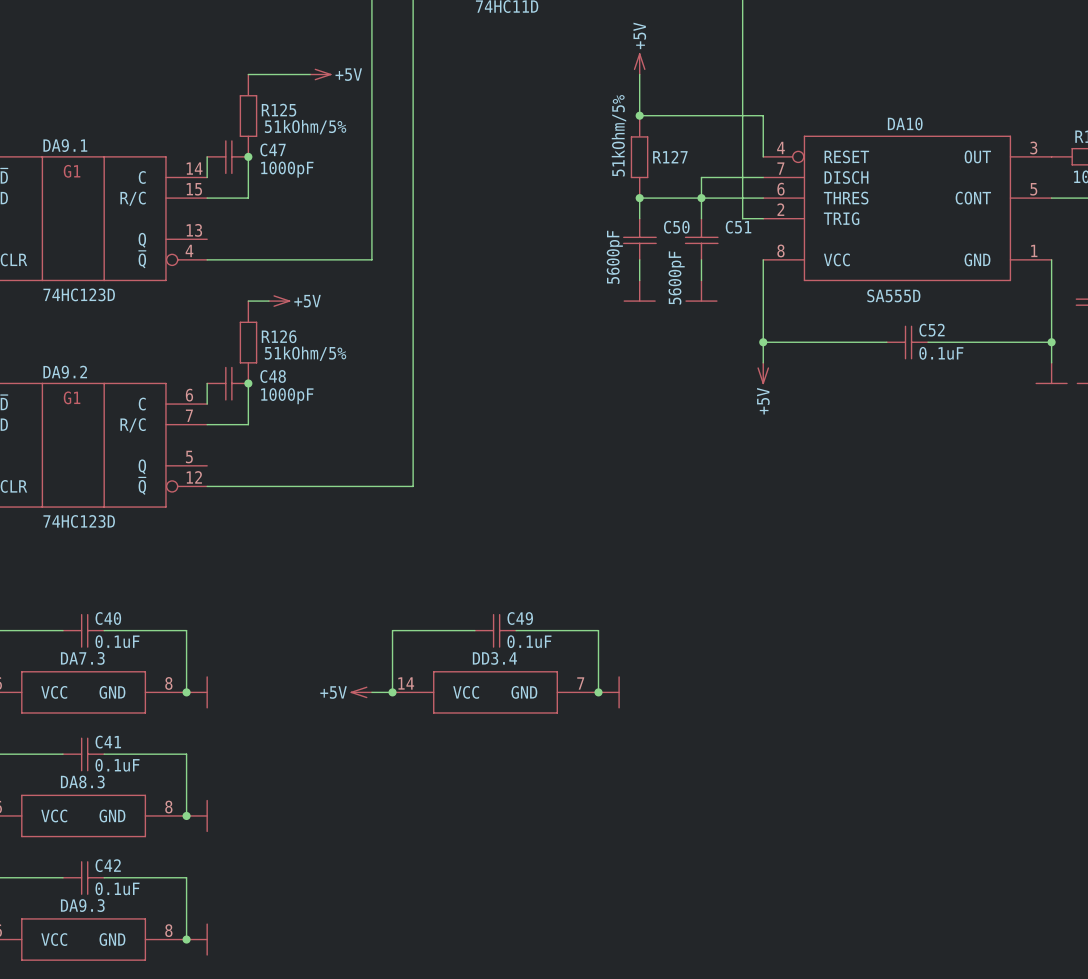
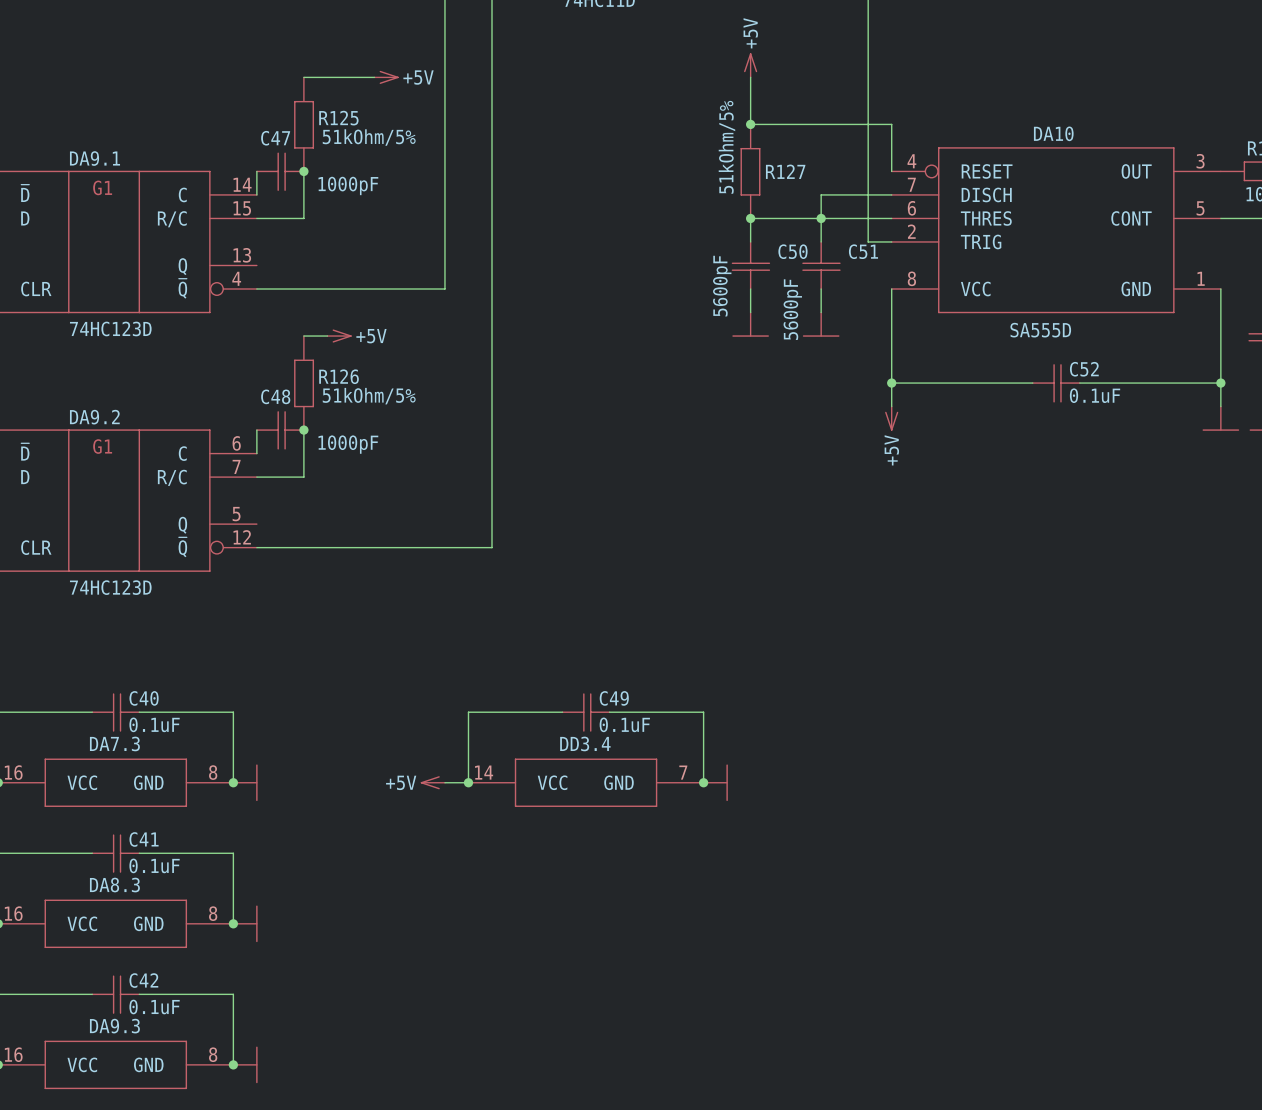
C47 name position: C47 (273, 149) -> C47 (275, 138)
C48 name position: C48 (273, 376) -> C48 (275, 396)

